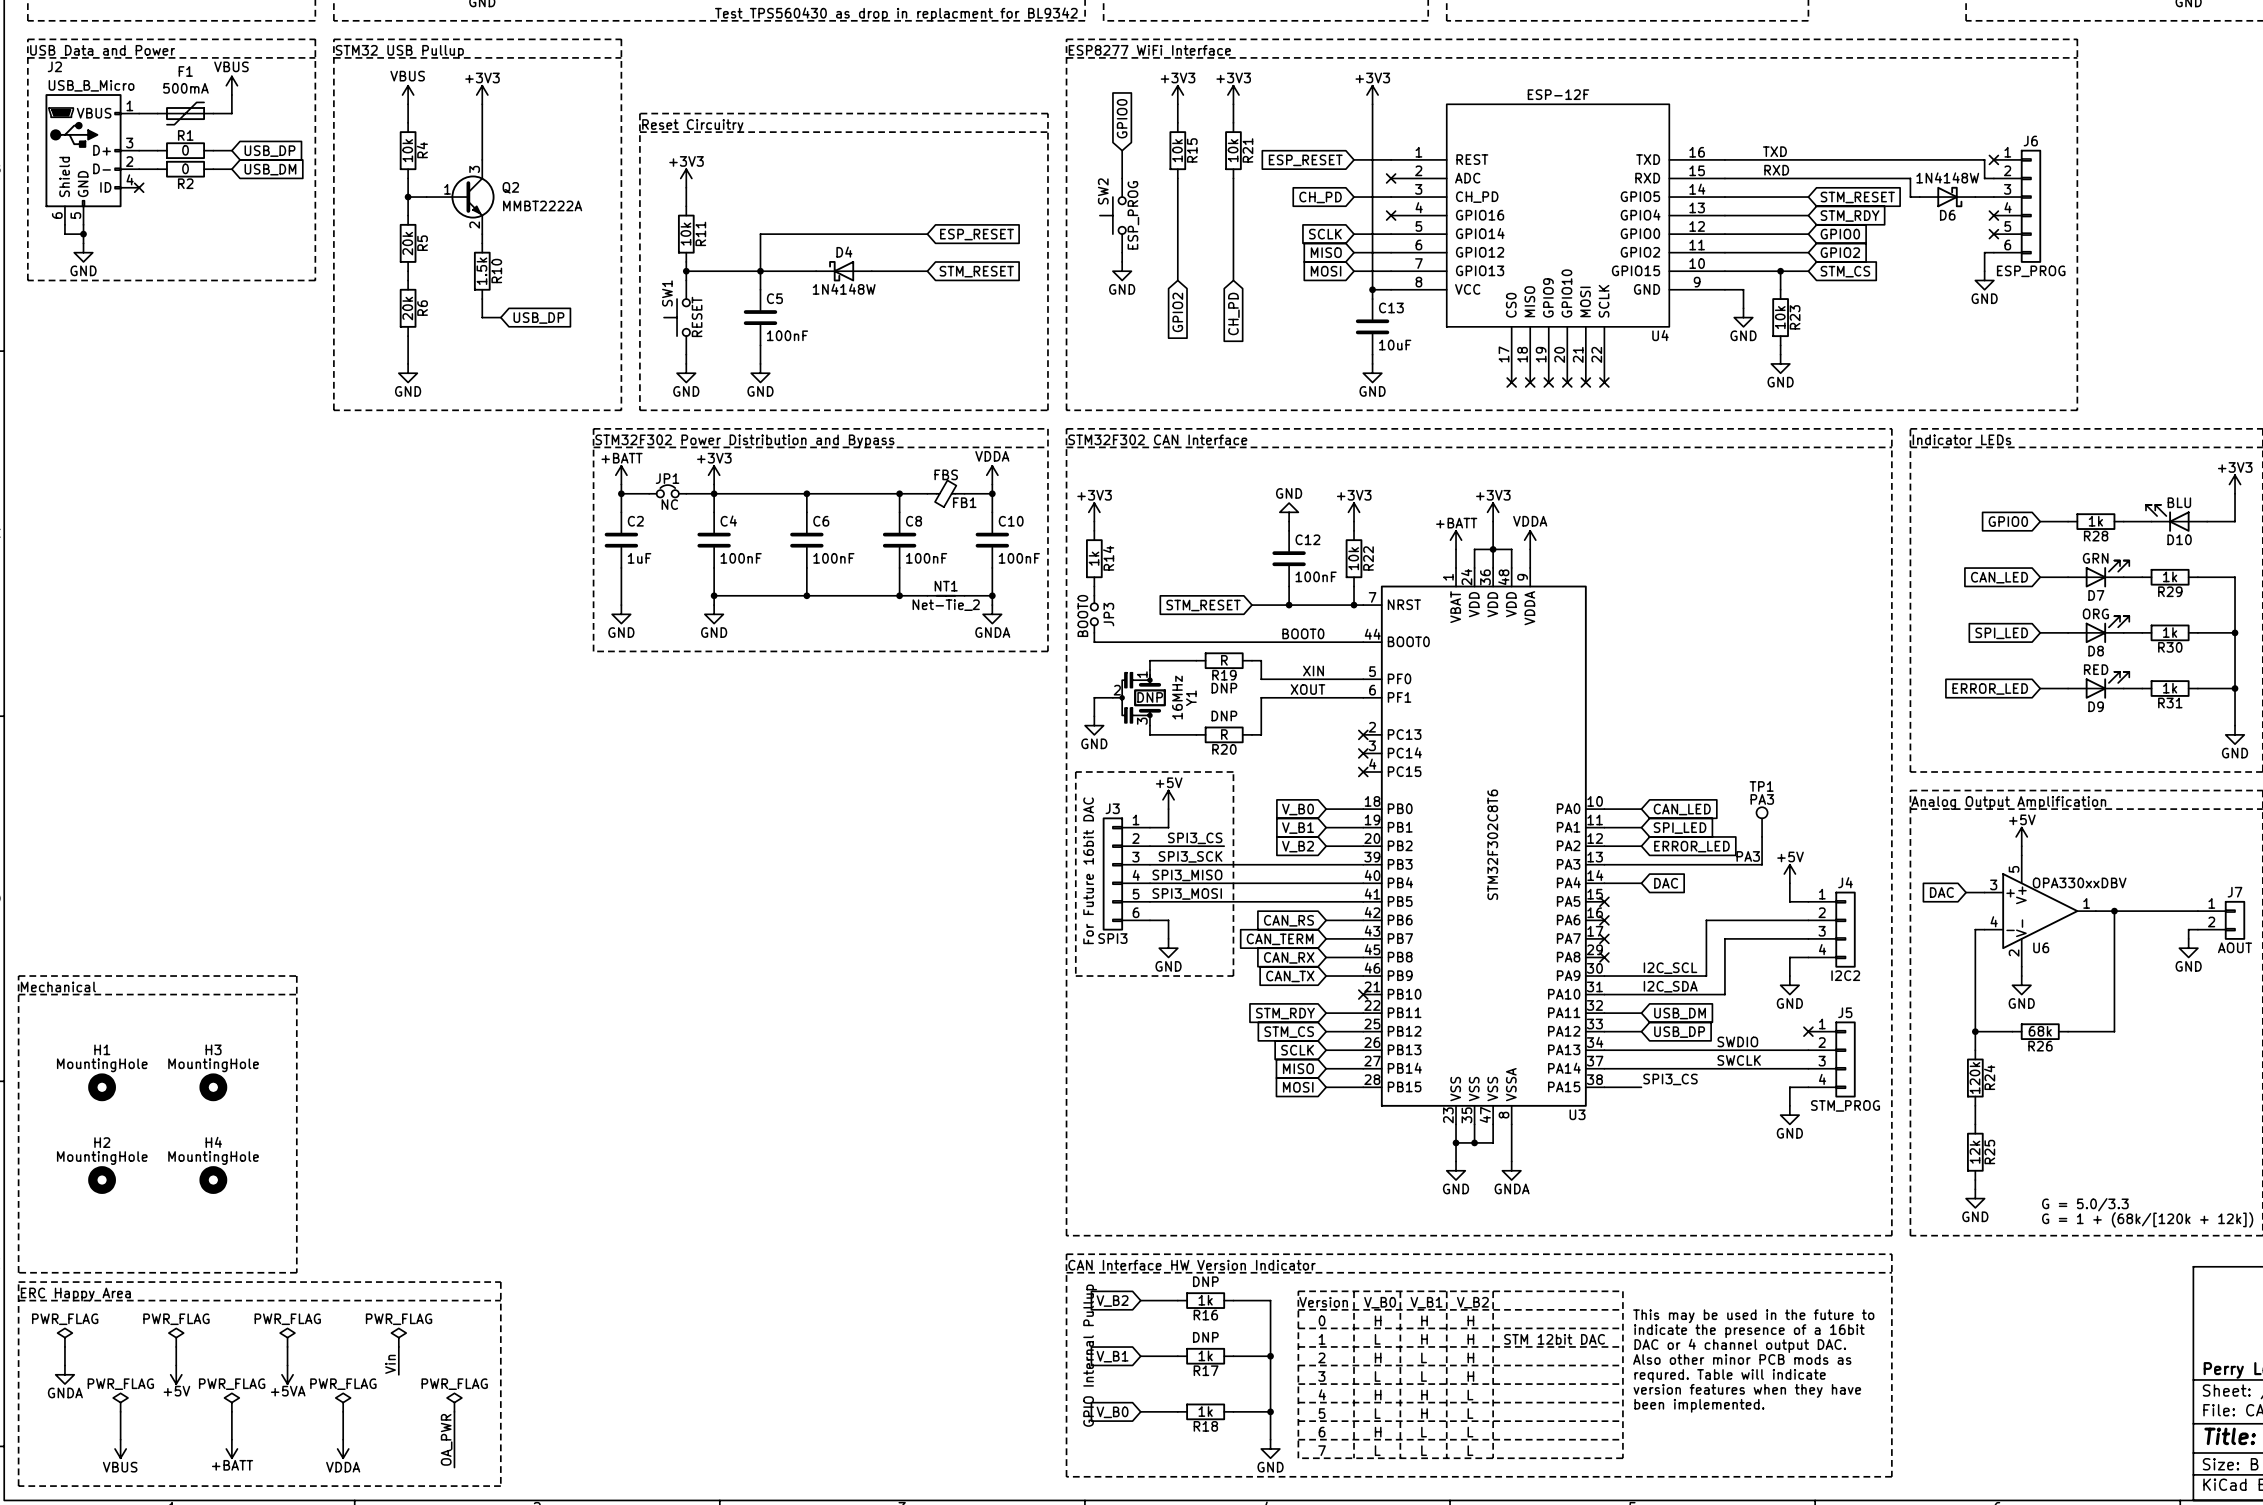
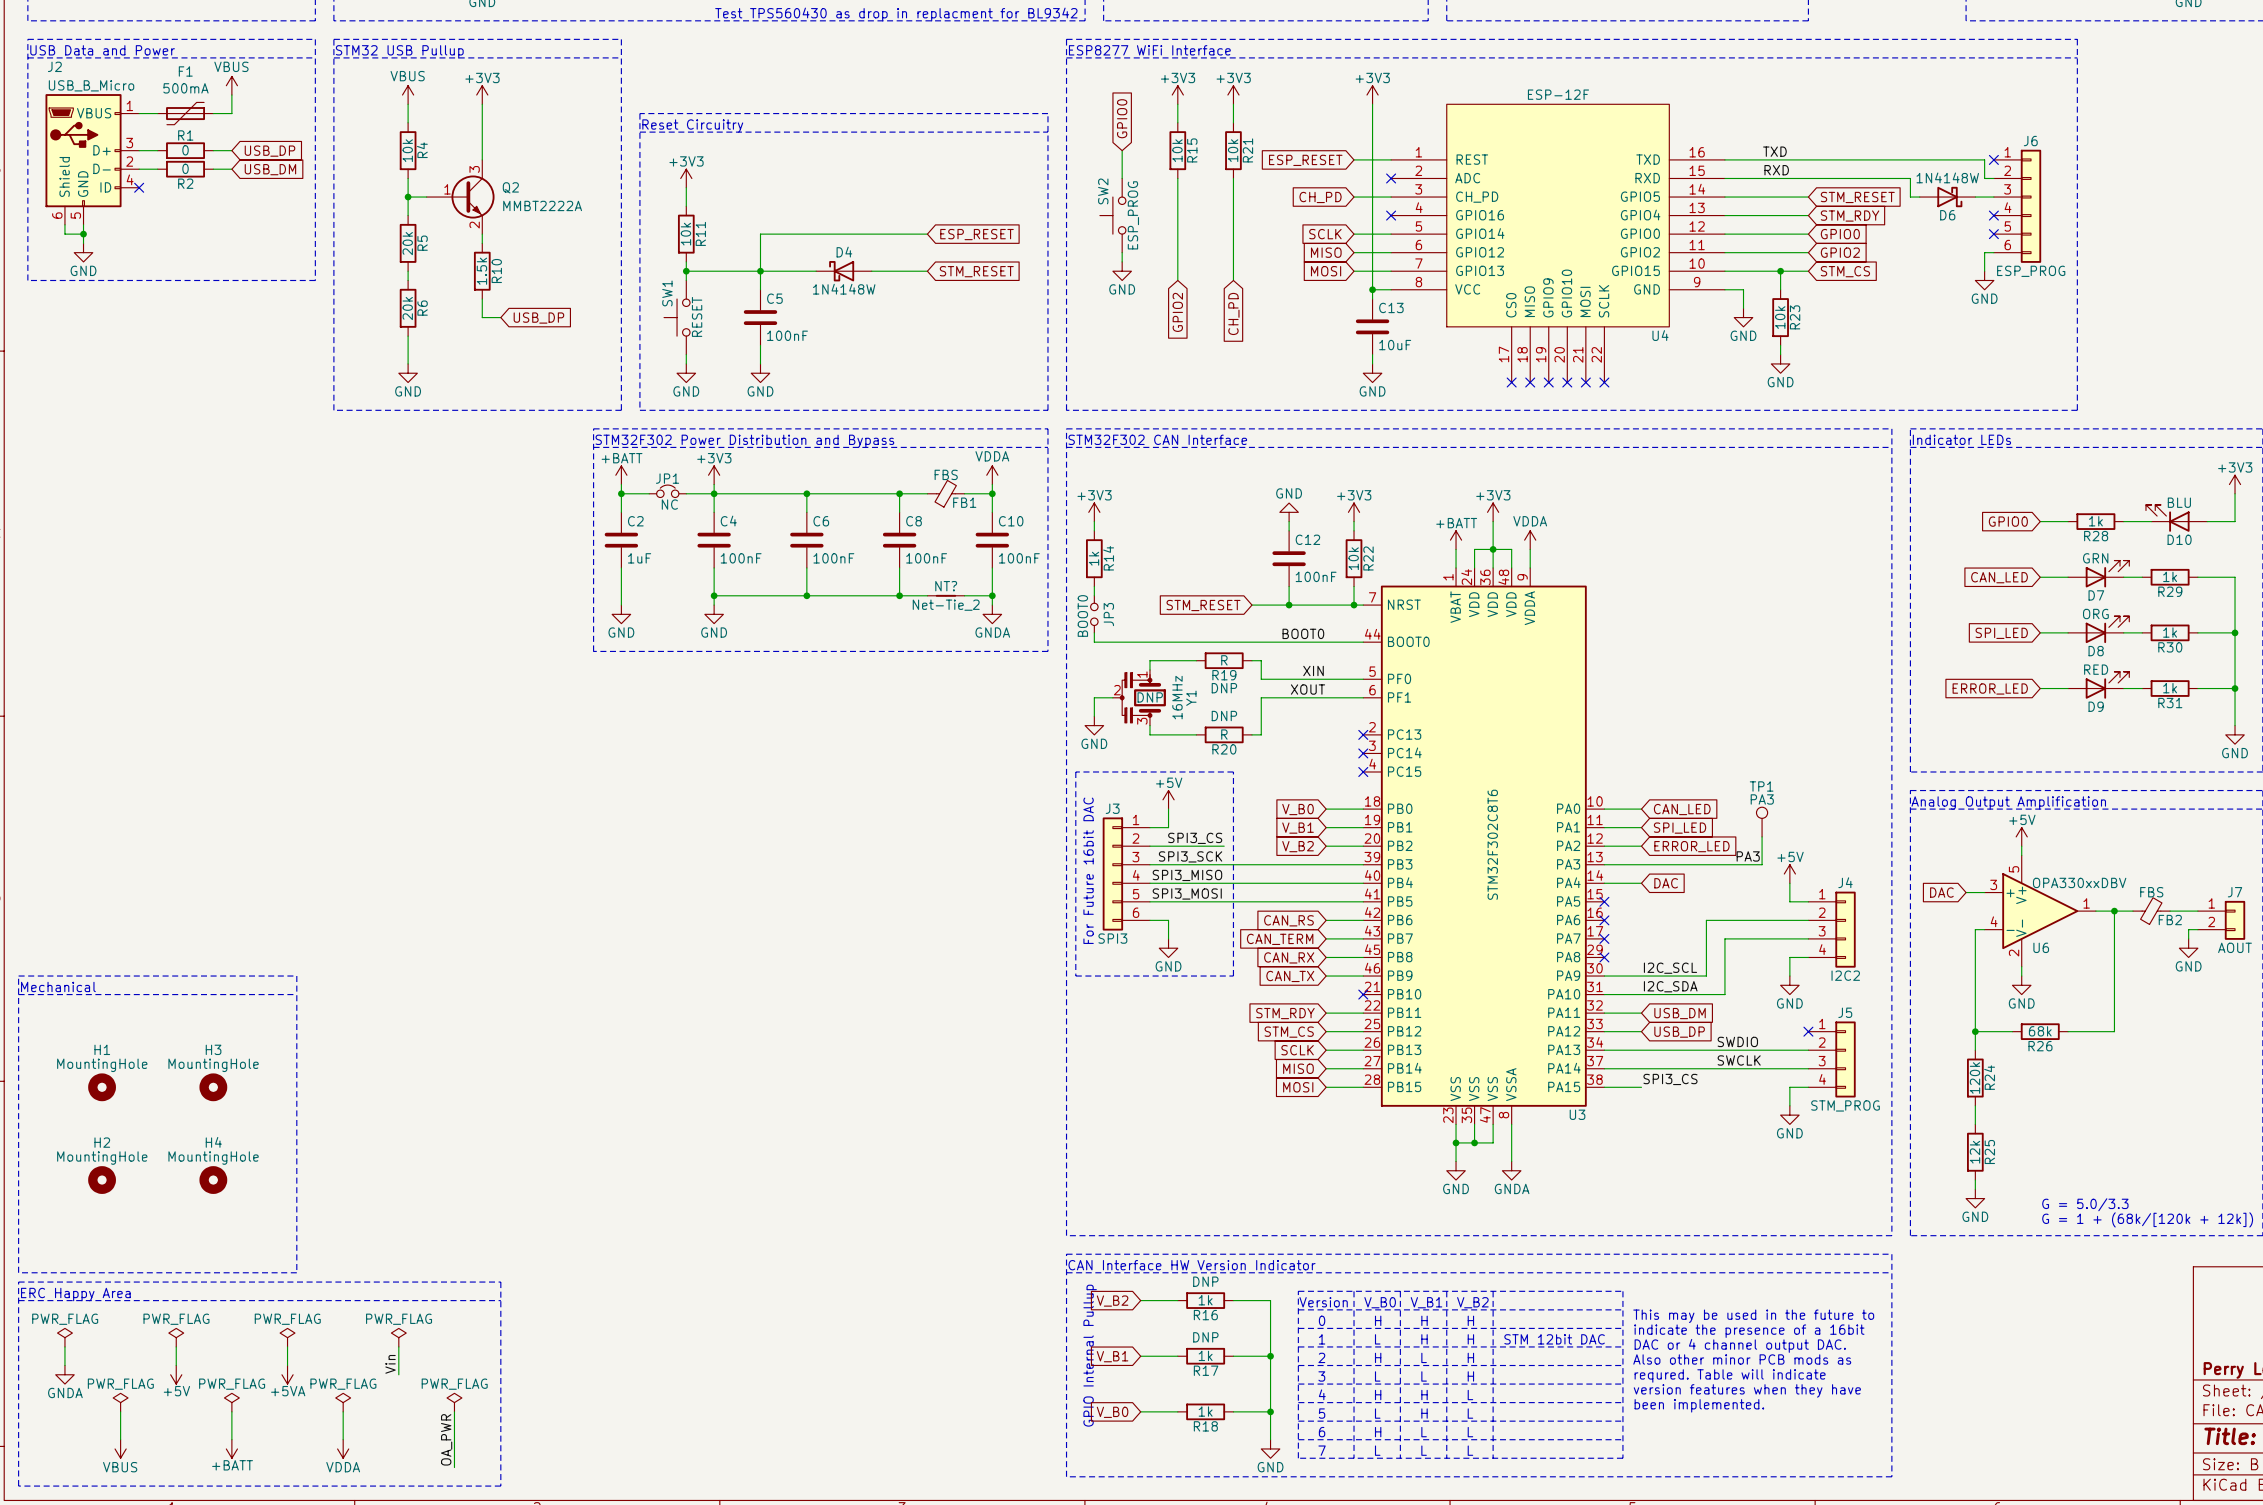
NT1 name: NT1 (946, 586) -> NT? (946, 586)
FB2: none -> FBS (2151, 911)

